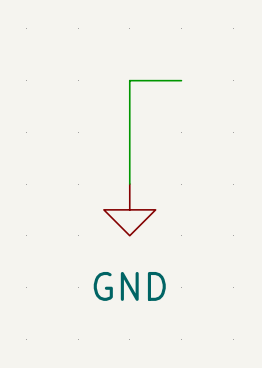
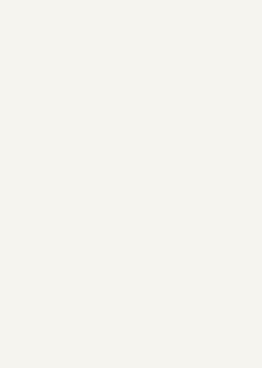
wire: (181, 80) (129, 80) (129, 184) -> none
power symbol: GND (129, 209) -> none

